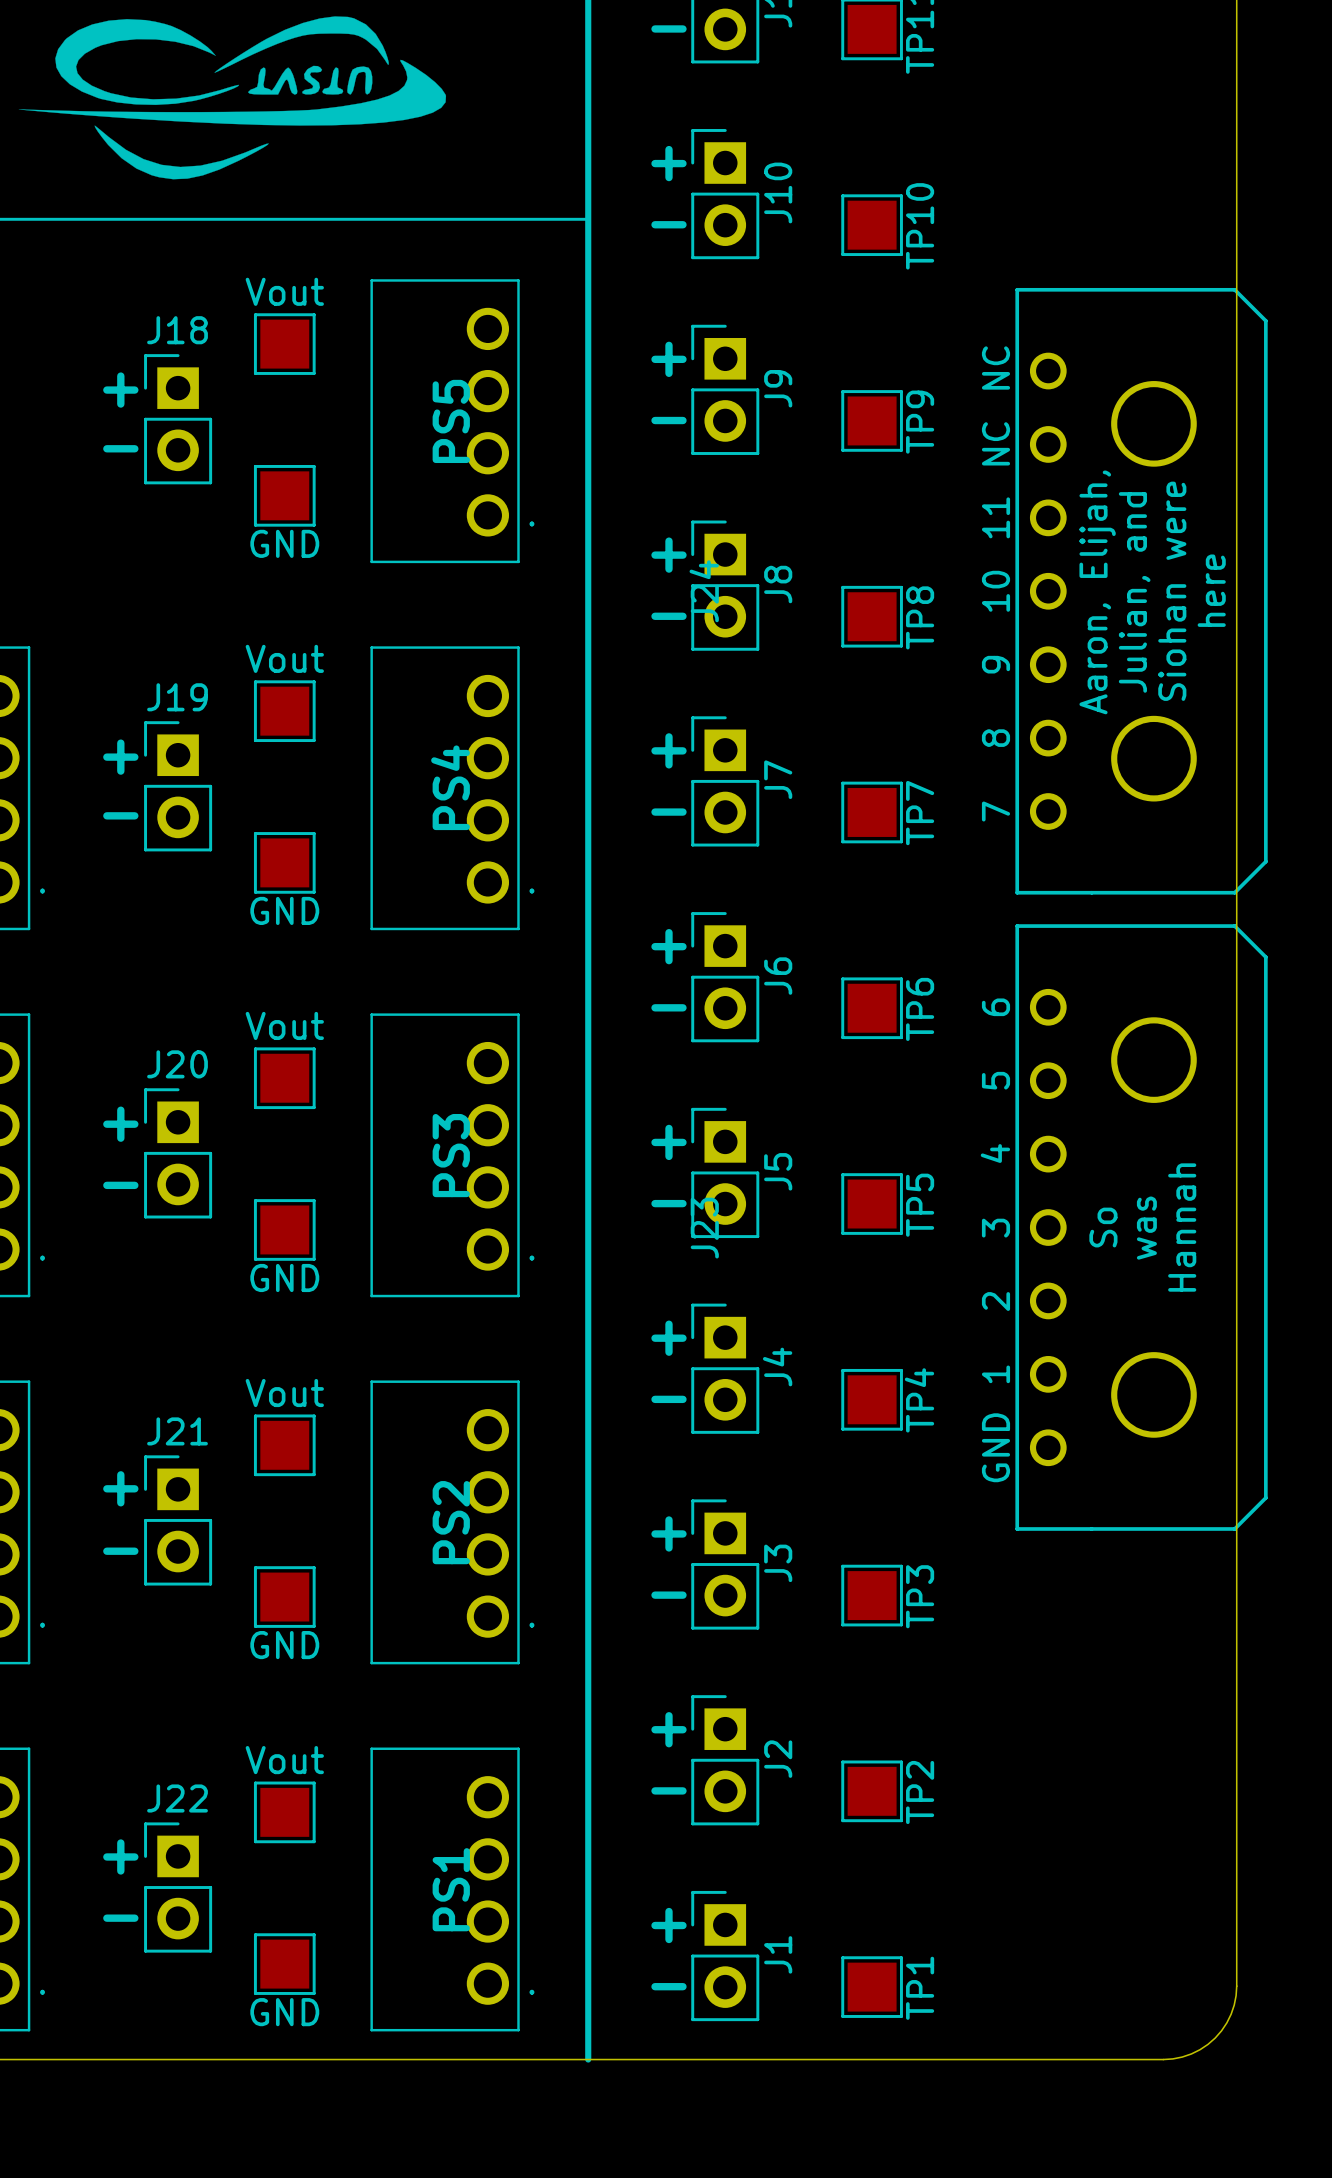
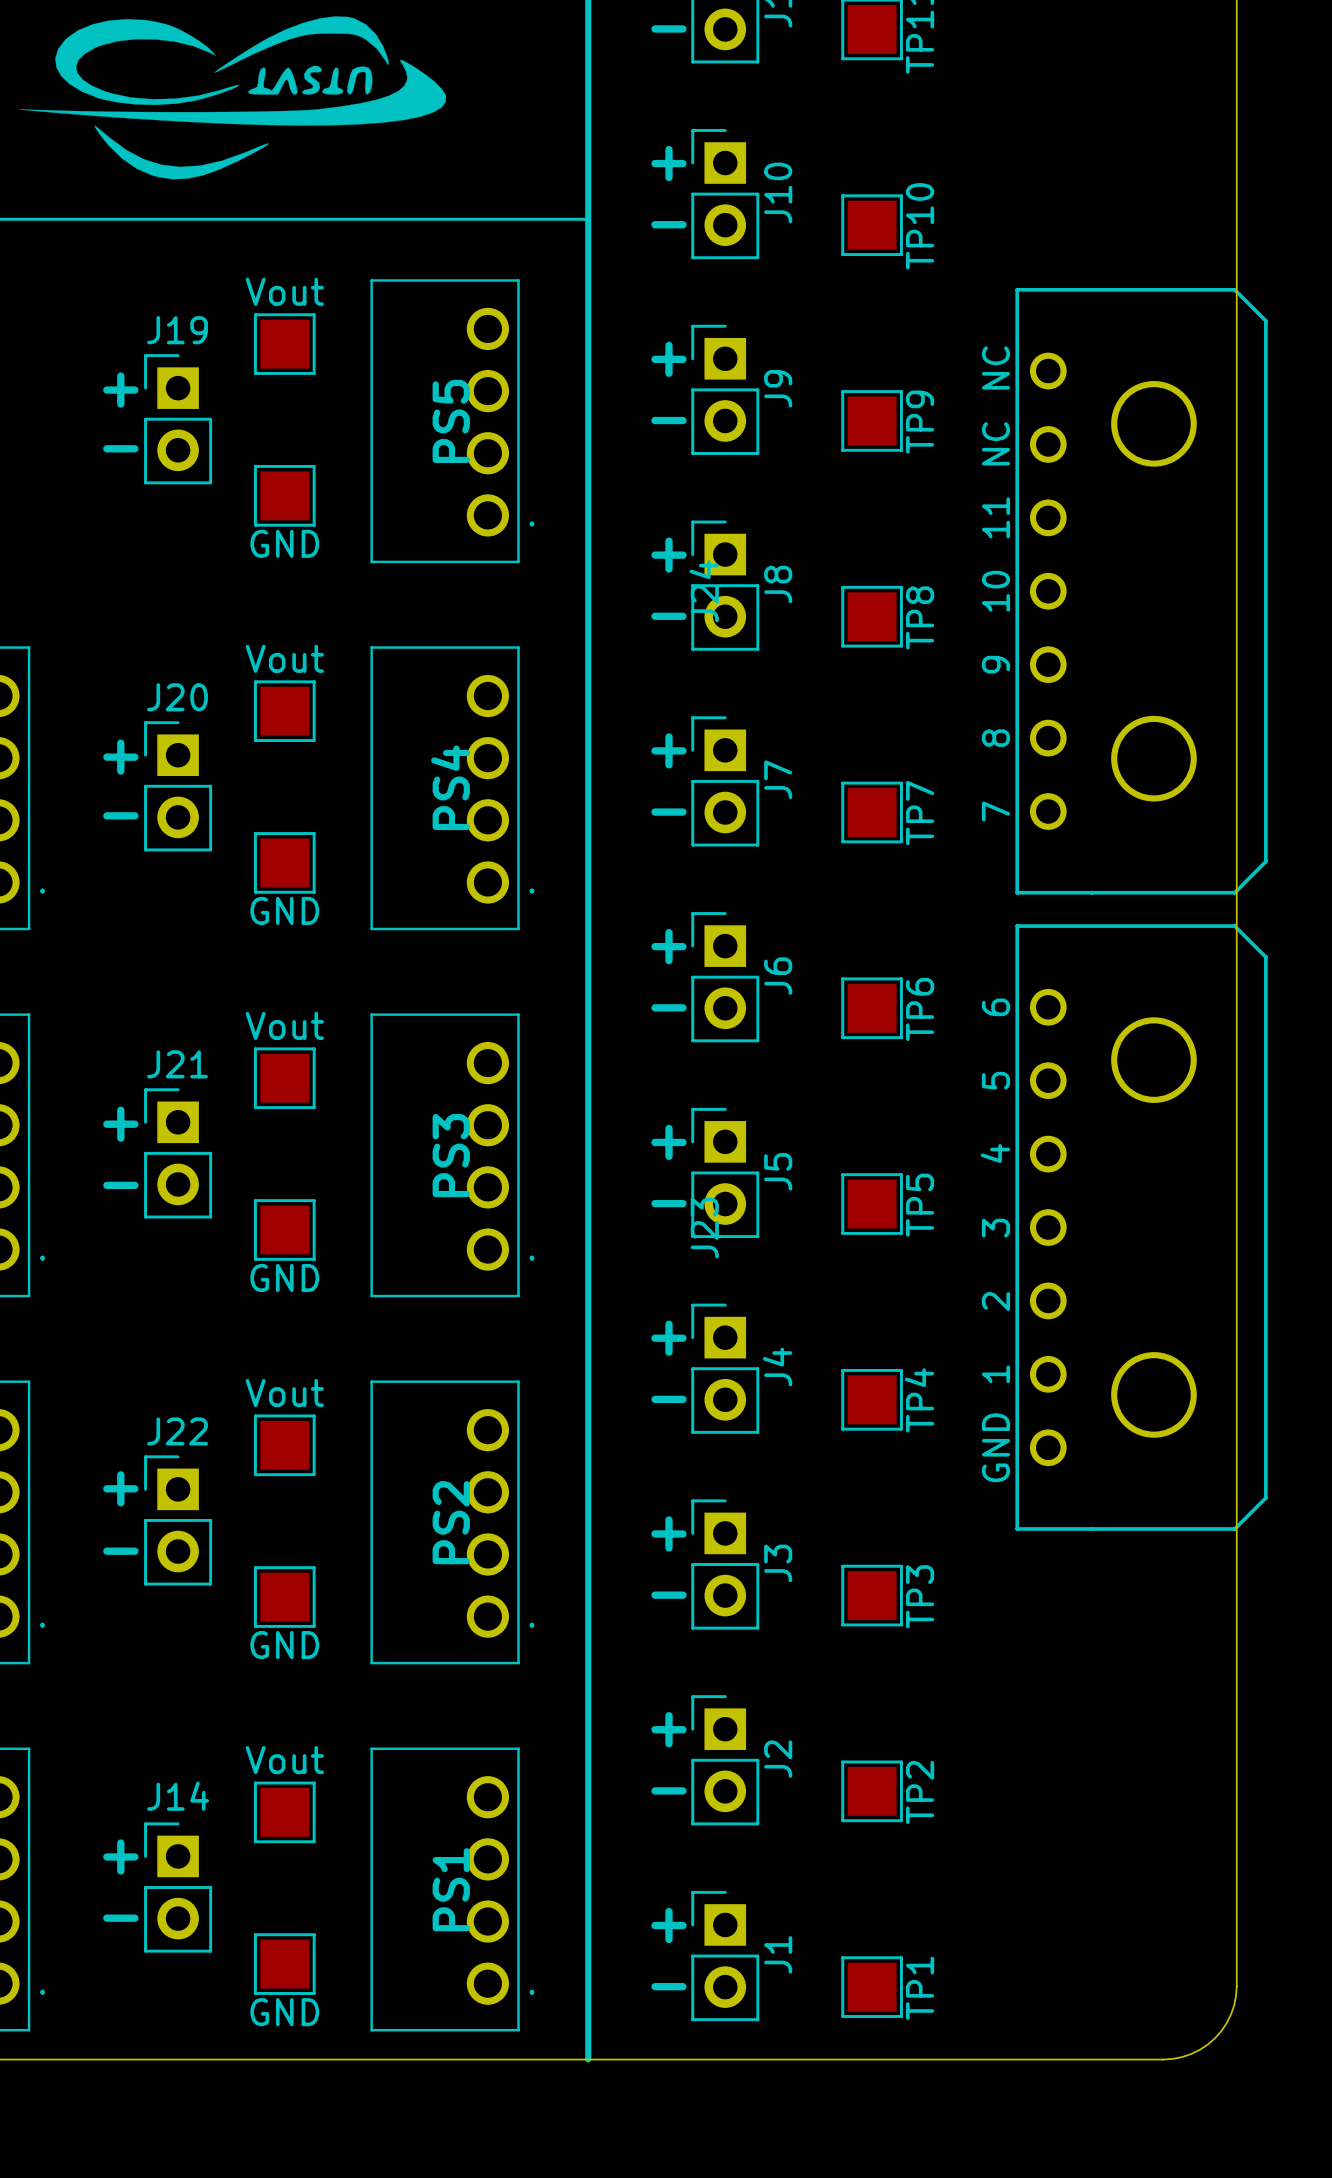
J18 name: J18 (177, 330) -> J19 (177, 330)
text: here (1211, 590) -> none
text: Siohan were (1172, 591) -> none
text: Aaron, Elijah, (1097, 592) -> none
text: Julian, and (1134, 592) -> none
J19 name: J19 (177, 697) -> J20 (177, 697)
J20 name: J20 (177, 1064) -> J21 (177, 1064)
text: So (1103, 1227) -> none
text: Hannah (1182, 1227) -> none
text: was (1146, 1228) -> none
J21 name: J21 (177, 1431) -> J22 (177, 1431)
J22 name: J22 (177, 1798) -> J14 (178, 1796)

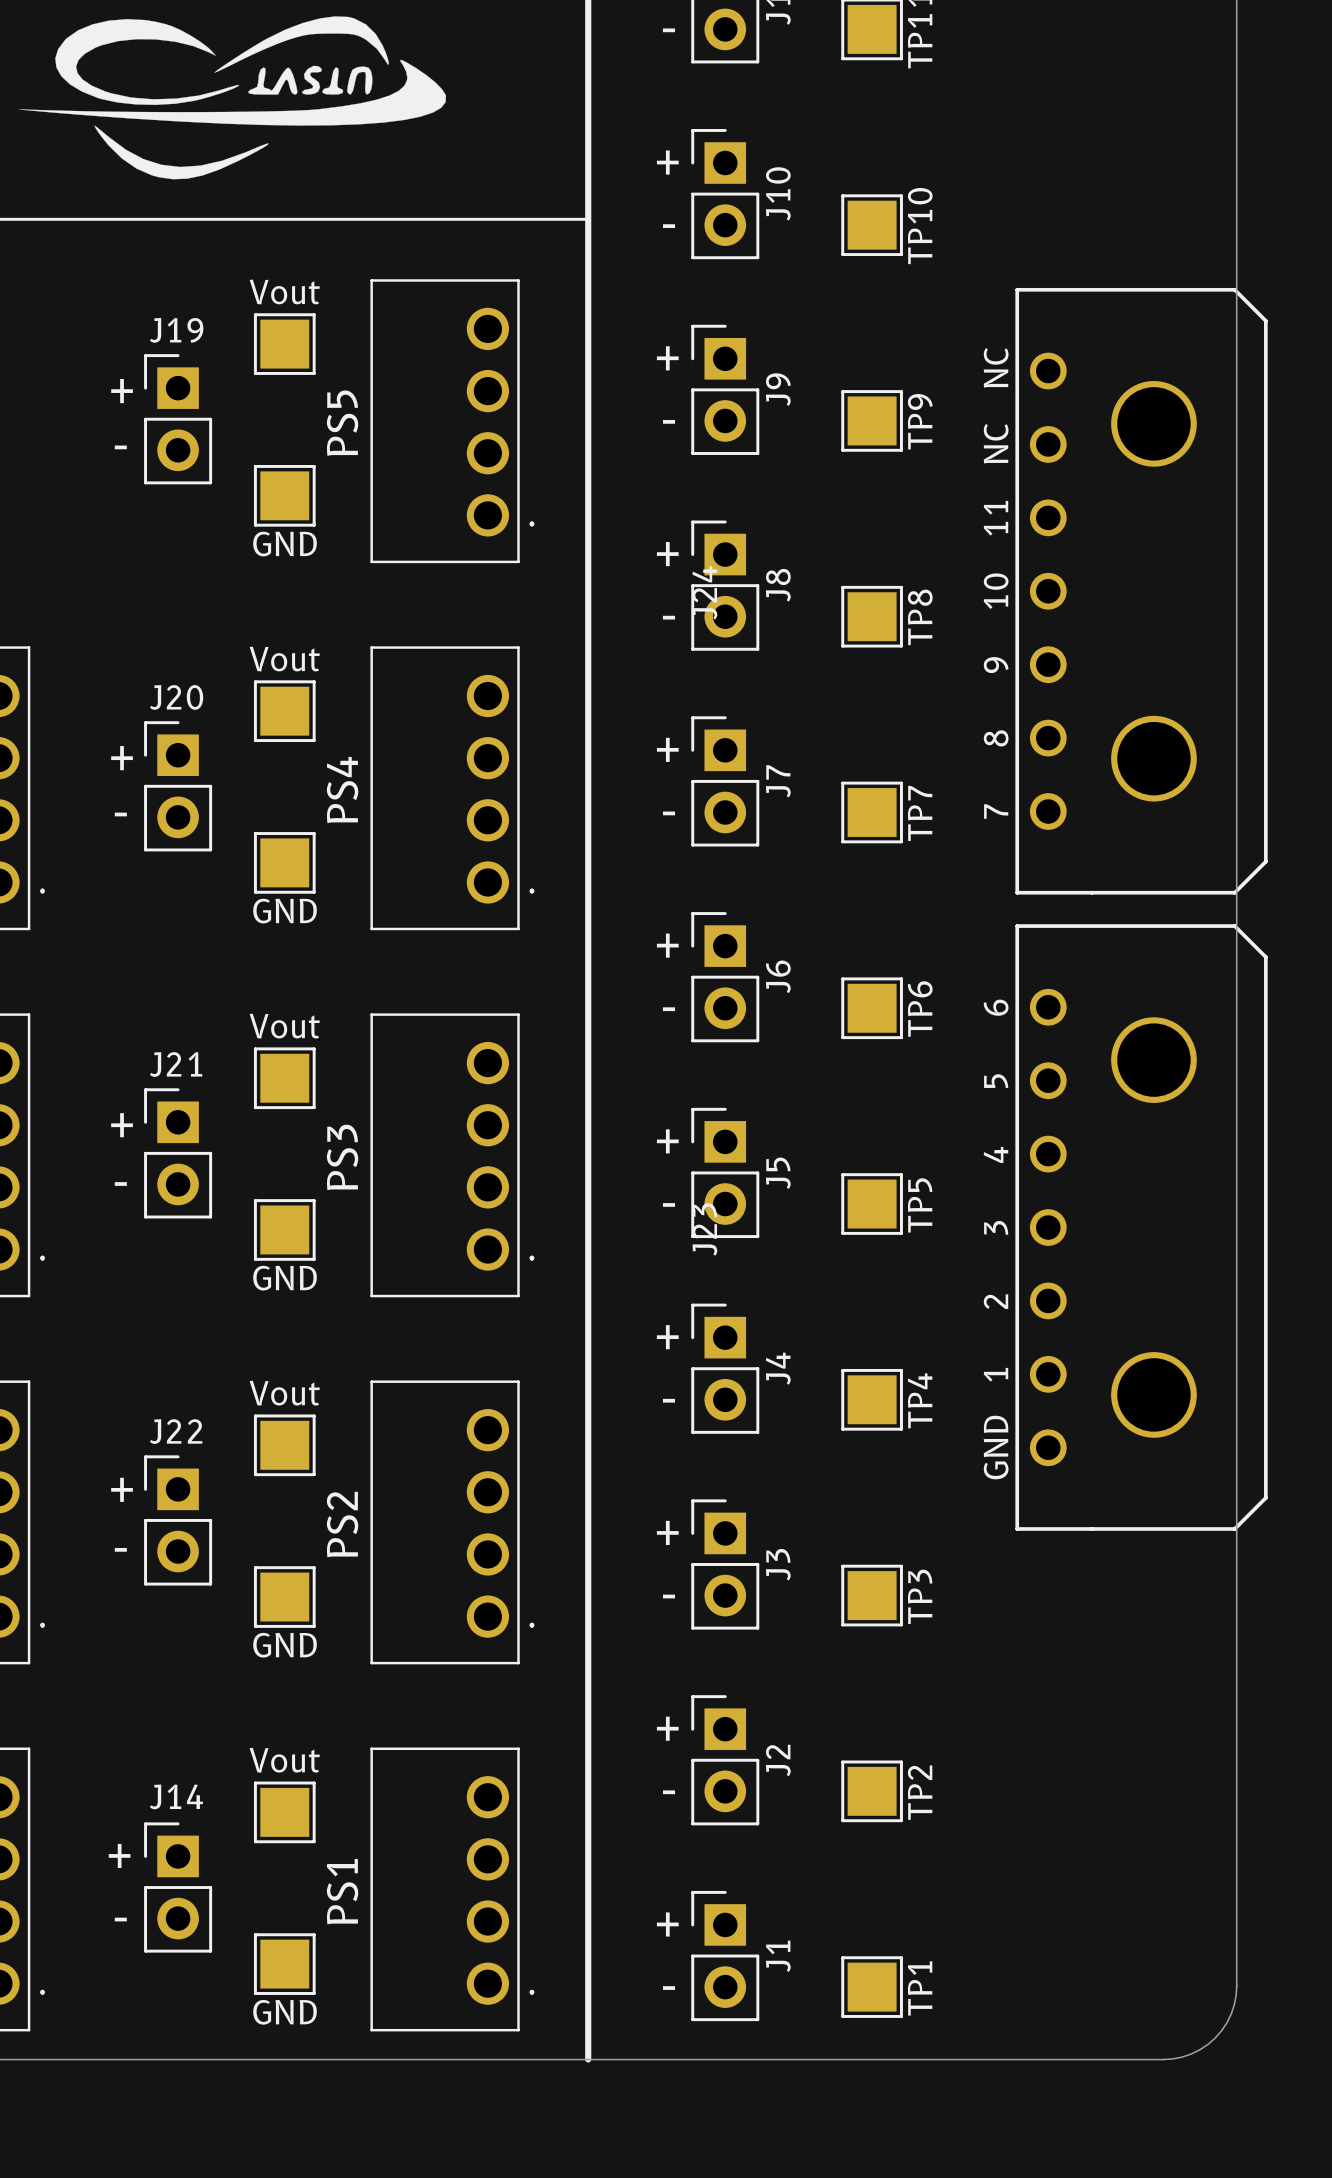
PS5 name position: PS5 (451, 421) -> PS5 (342, 423)
PS4 name position: PS4 (450, 787) -> PS4 (342, 789)
PS3 name position: PS3 (451, 1155) -> PS3 (342, 1157)
PS2 name position: PS2 (451, 1522) -> PS2 (342, 1524)
PS1 name position: PS1 (451, 1889) -> PS1 (342, 1891)

